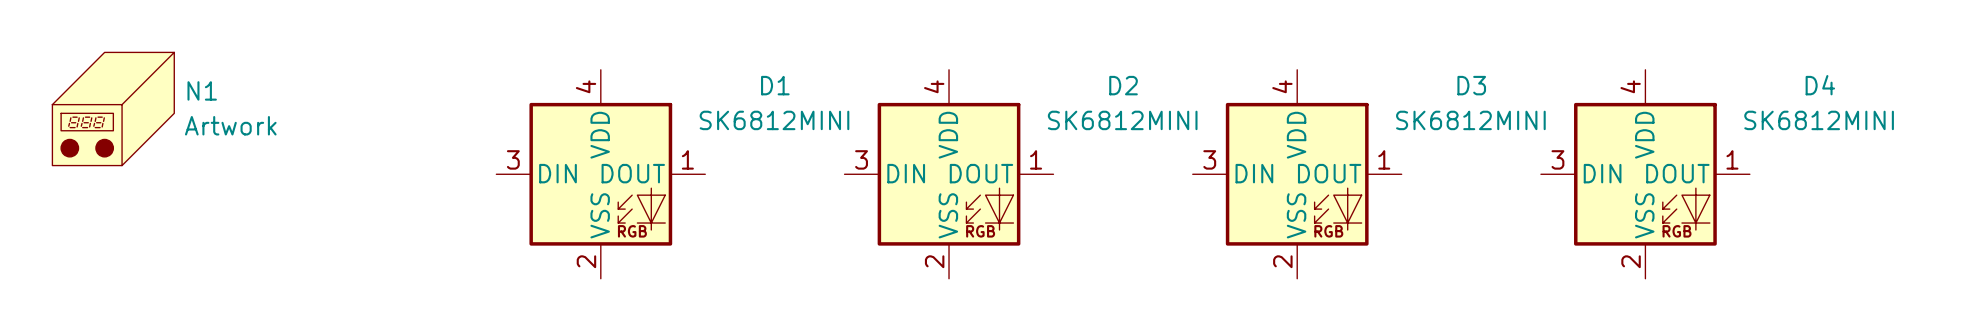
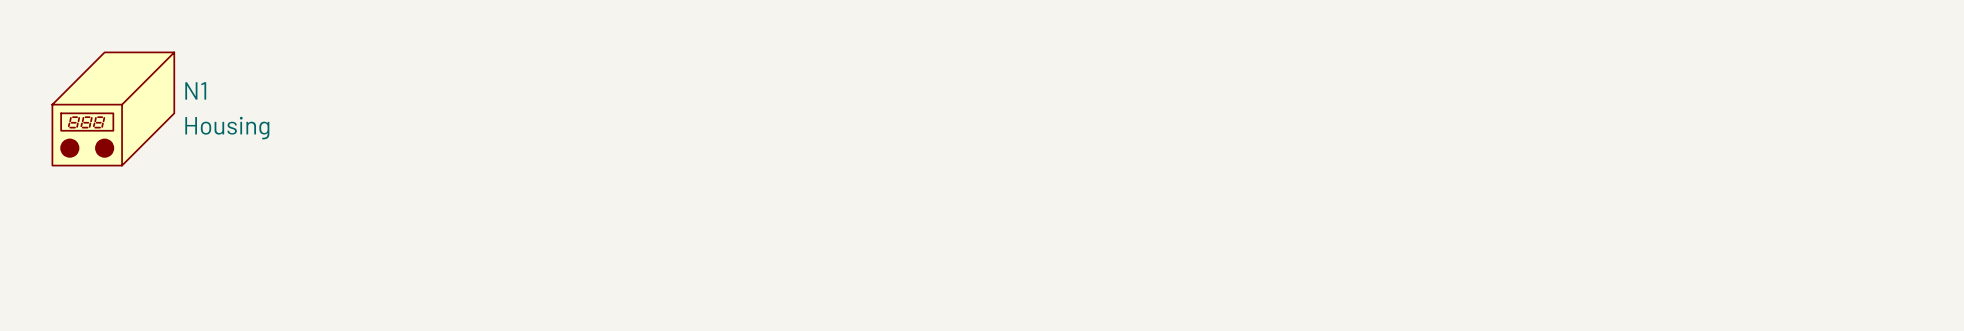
N1 value: Artwork (230, 125) -> Housing (227, 128)
D1: SK6812MINI (600, 174) -> none
D2: SK6812MINI (949, 174) -> none
D3: SK6812MINI (1297, 174) -> none
D4: SK6812MINI (1645, 174) -> none

